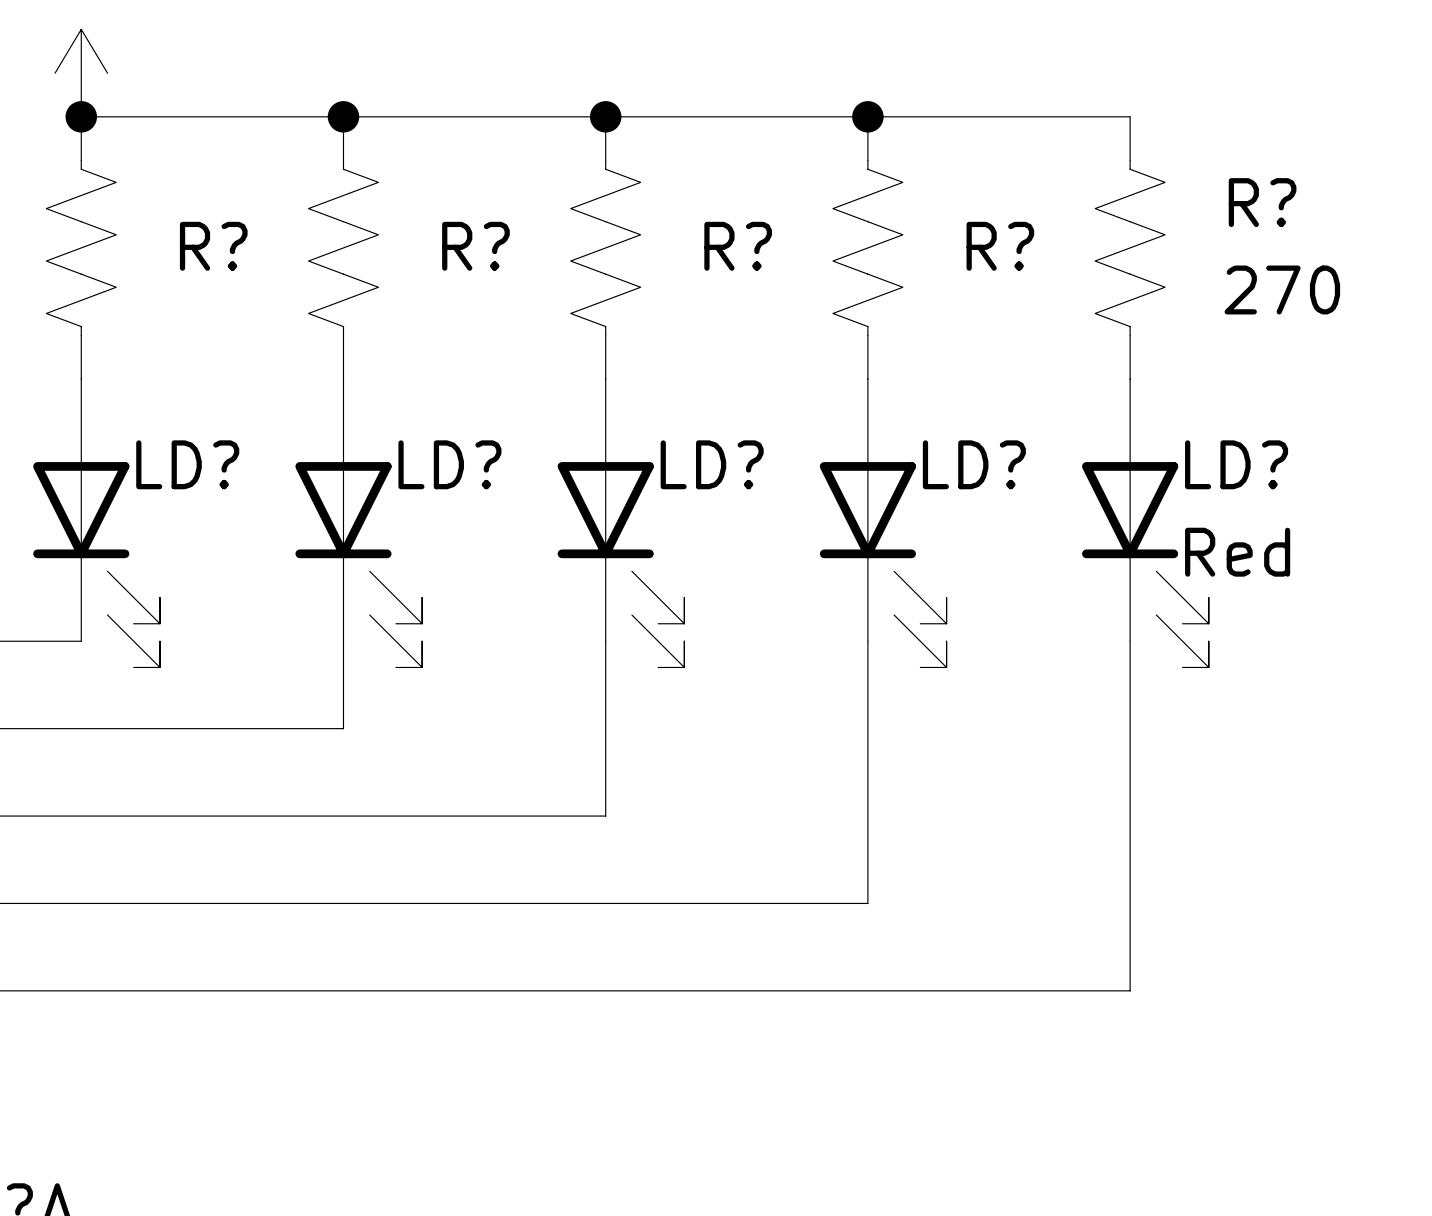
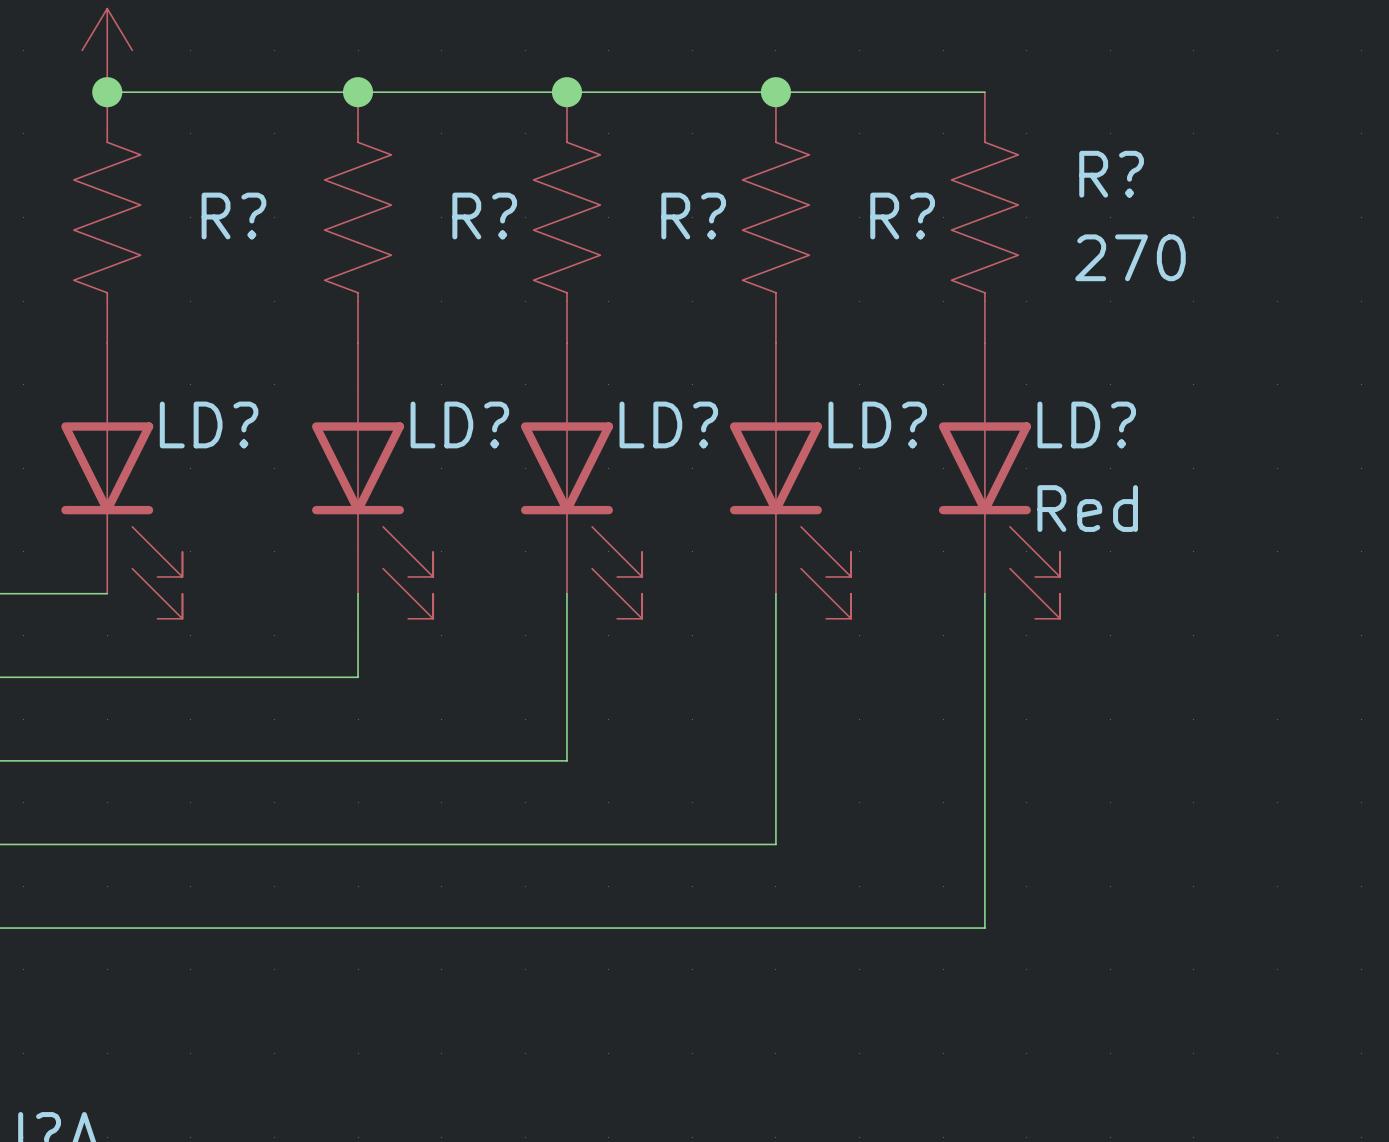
junction position: (605, 116) -> (566, 92)
junction: none -> (775, 92)
junction: (867, 116) -> none
wire: (999, 116) (1130, 116) -> none
R? position: (605, 247) -> (566, 217)
R?: none -> (775, 217)
R?: (867, 247) -> none
R? position: (1130, 247) -> (984, 217)
LD? position: (620, 523) -> (581, 480)
LD?: none -> (790, 480)
LD?: (883, 523) -> none
LD? position: (1145, 523) -> (999, 480)
wire: (605, 641) (605, 816) (561, 816) -> (566, 593) (566, 760)
wire: (867, 641) (867, 903) (780, 903) -> (775, 593) (775, 844)
wire: (1130, 641) (1130, 990) (999, 990) -> (984, 593) (984, 928)

